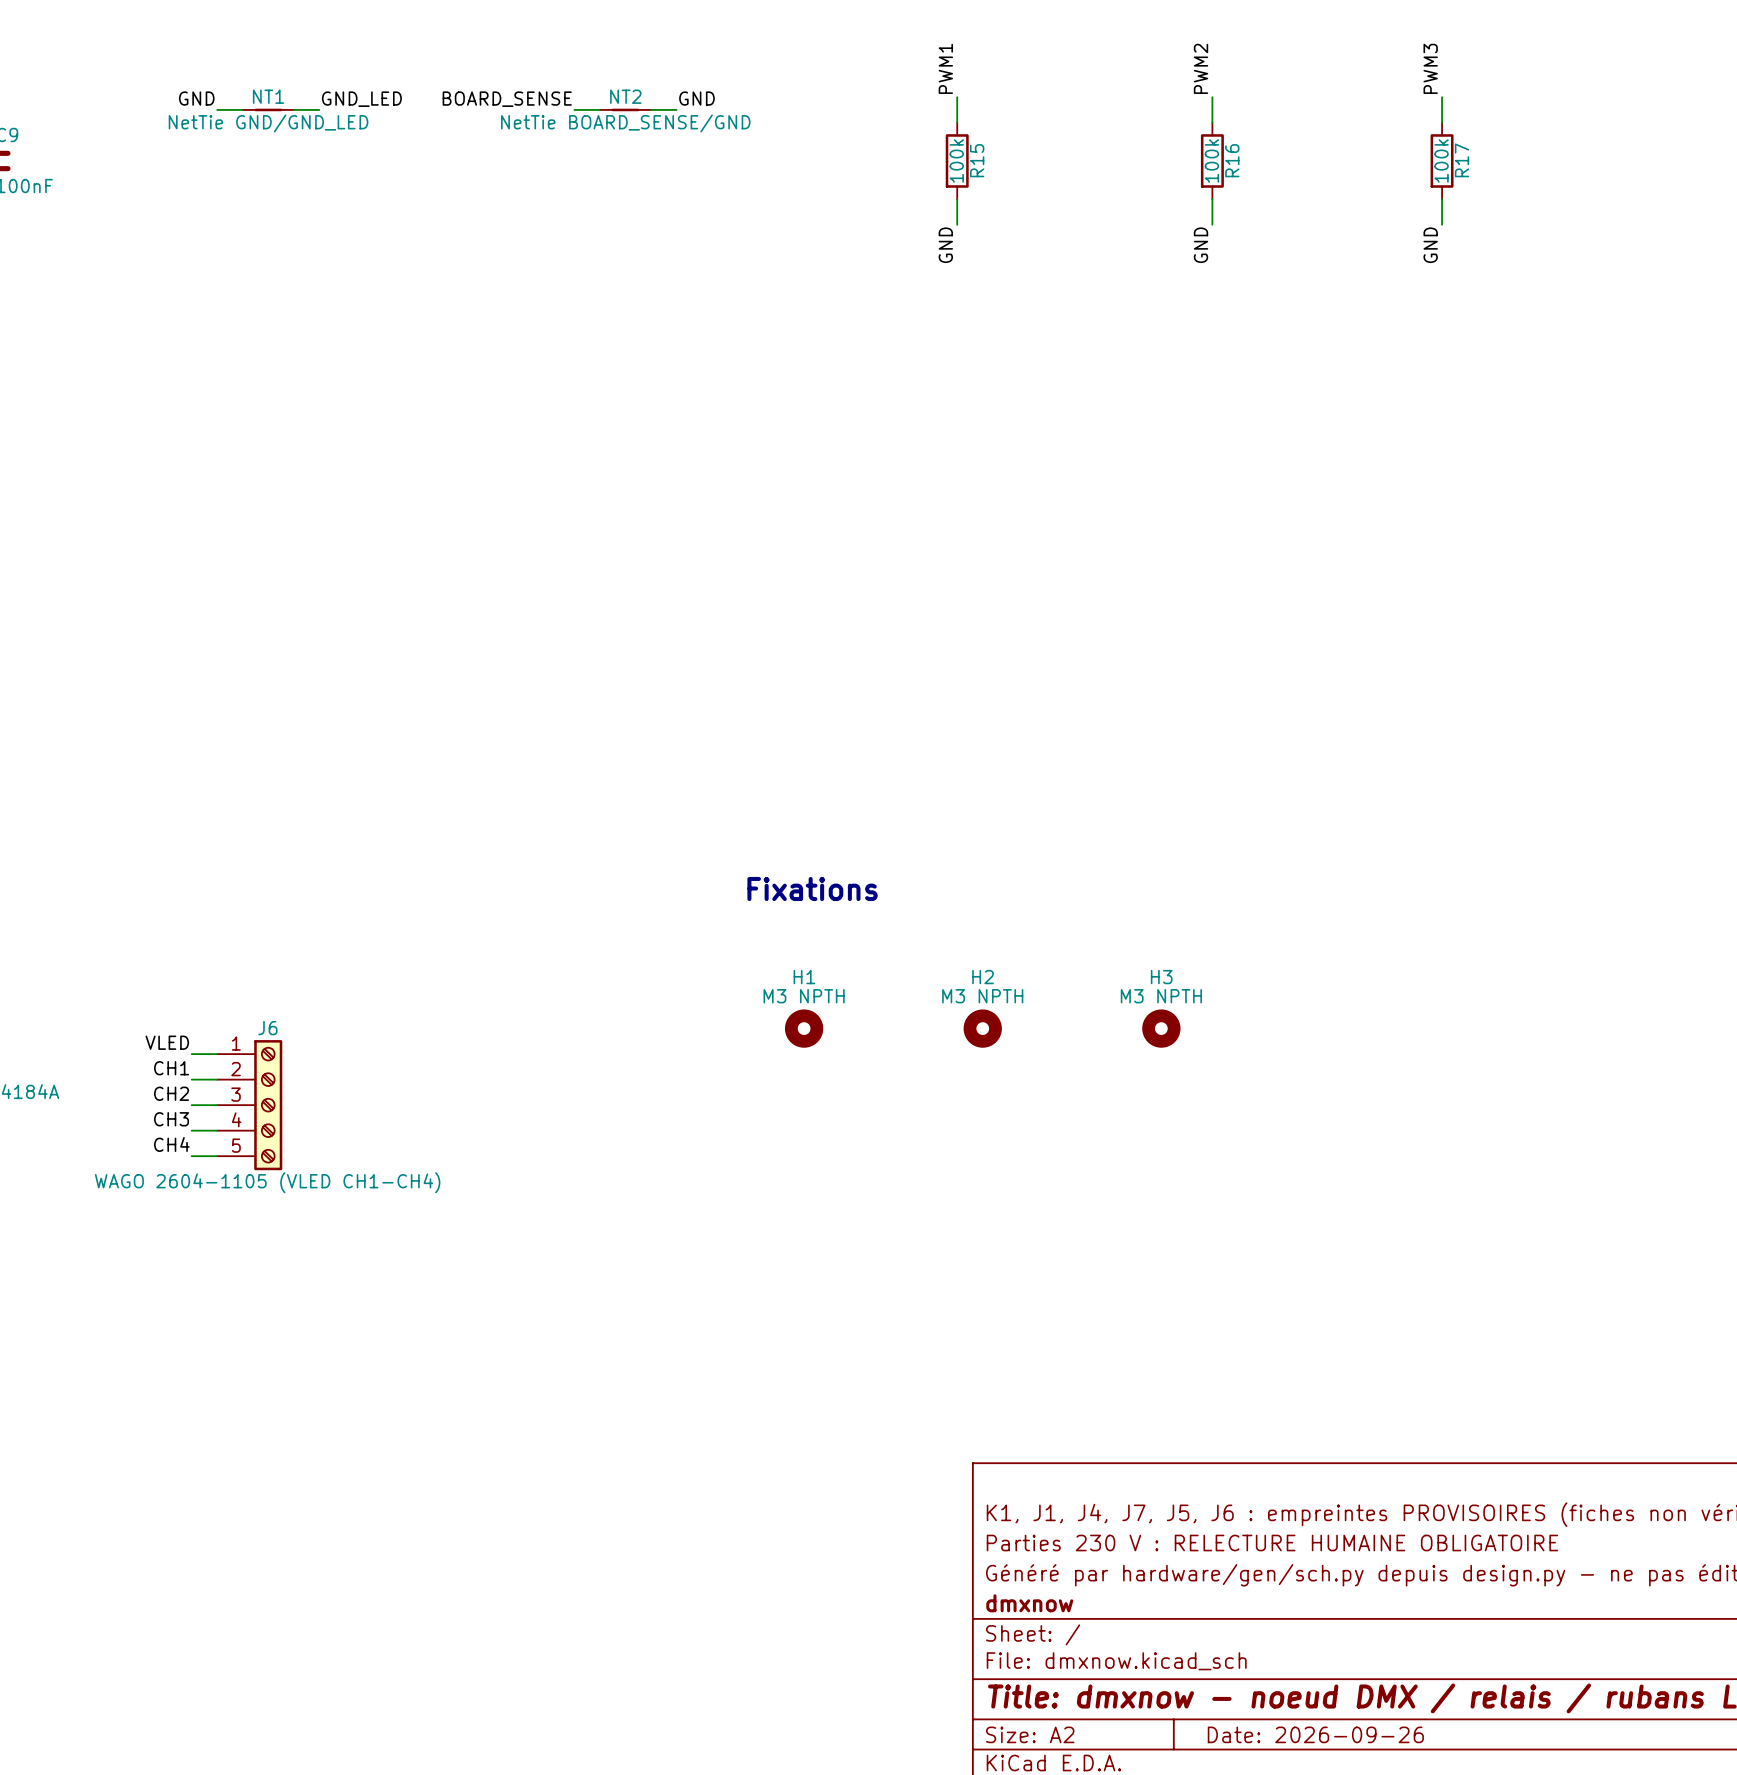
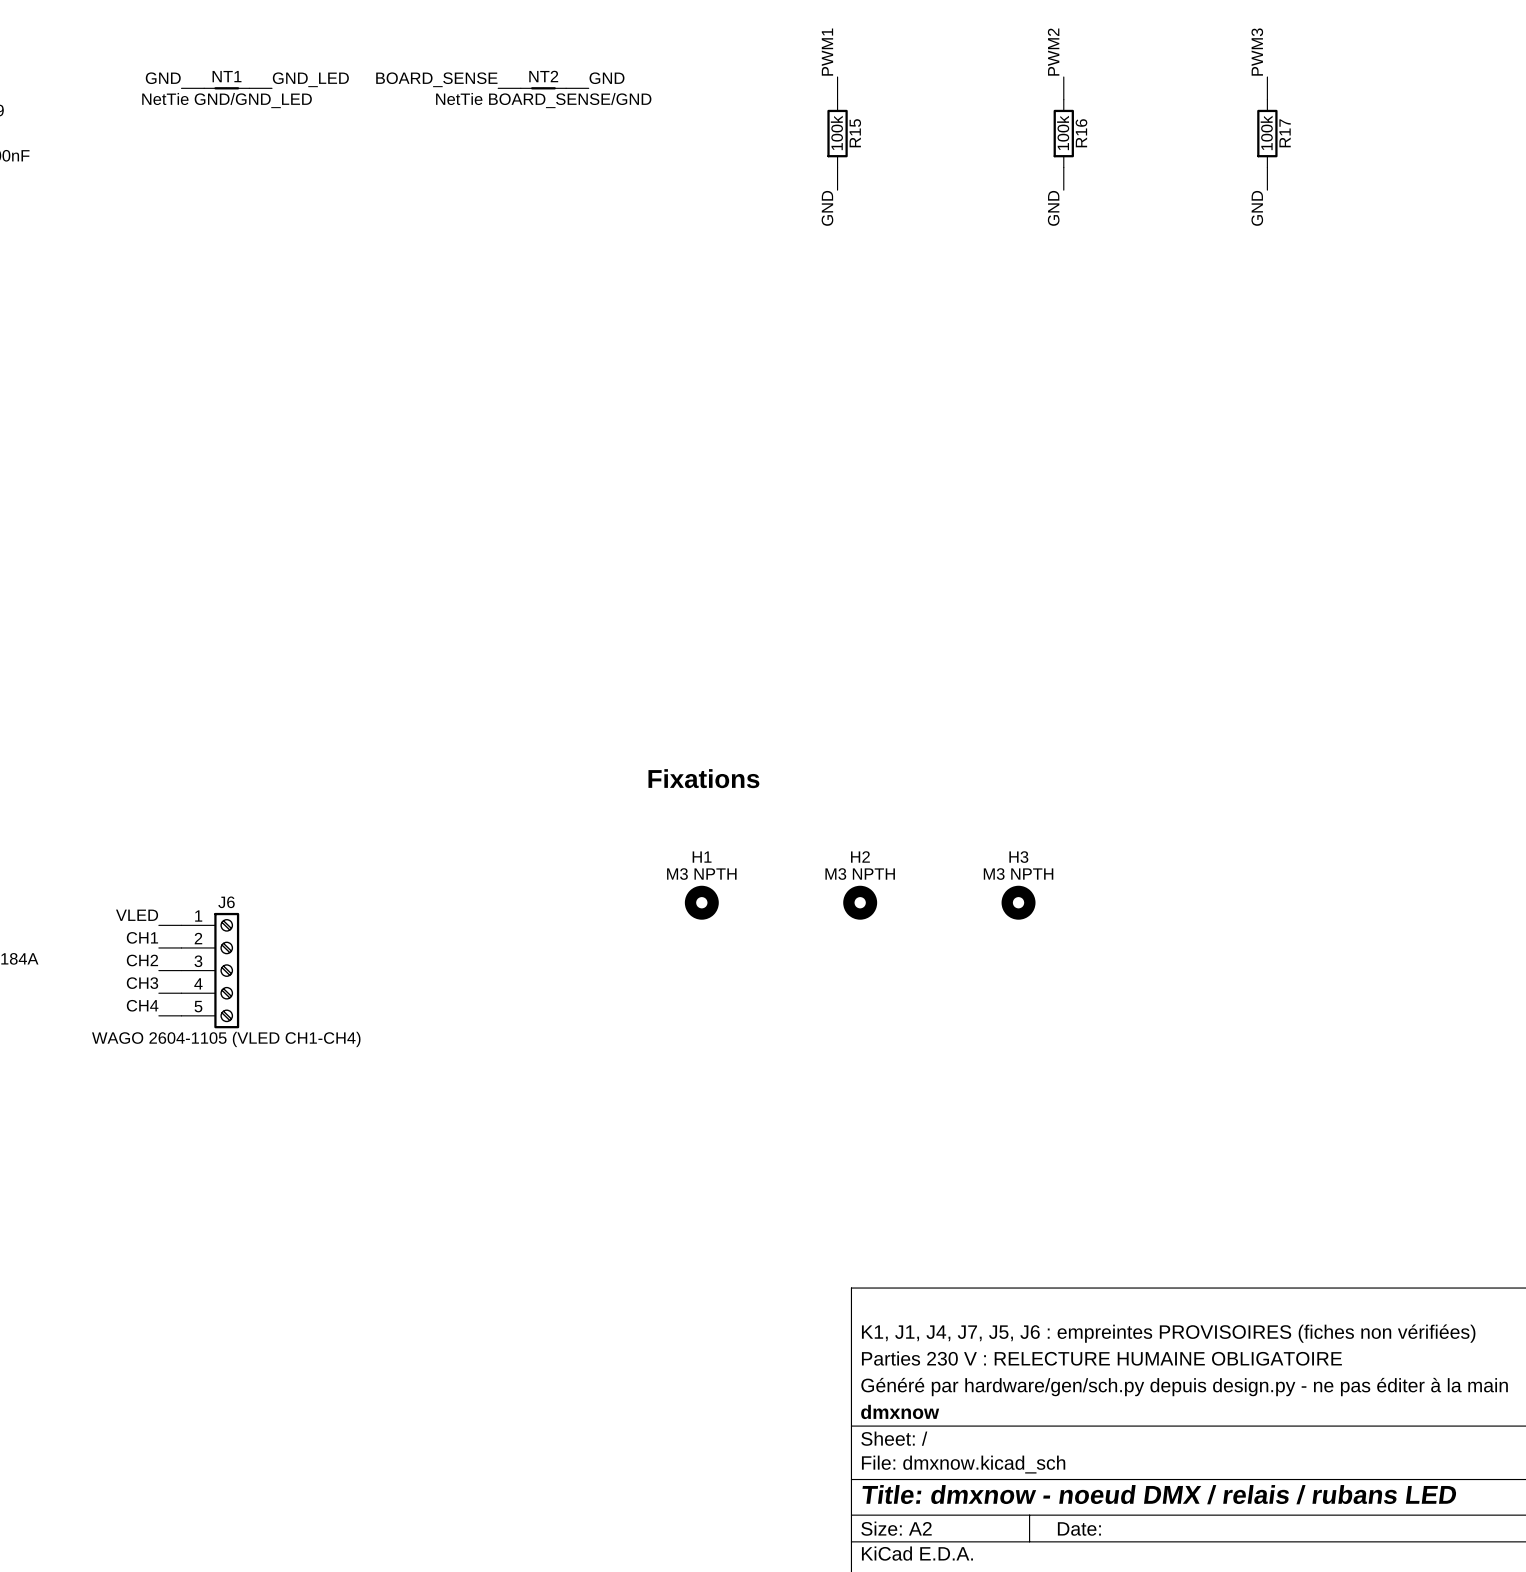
title block: Date: 2026-09-26 (1315, 1734) -> Date: (1079, 1528)

